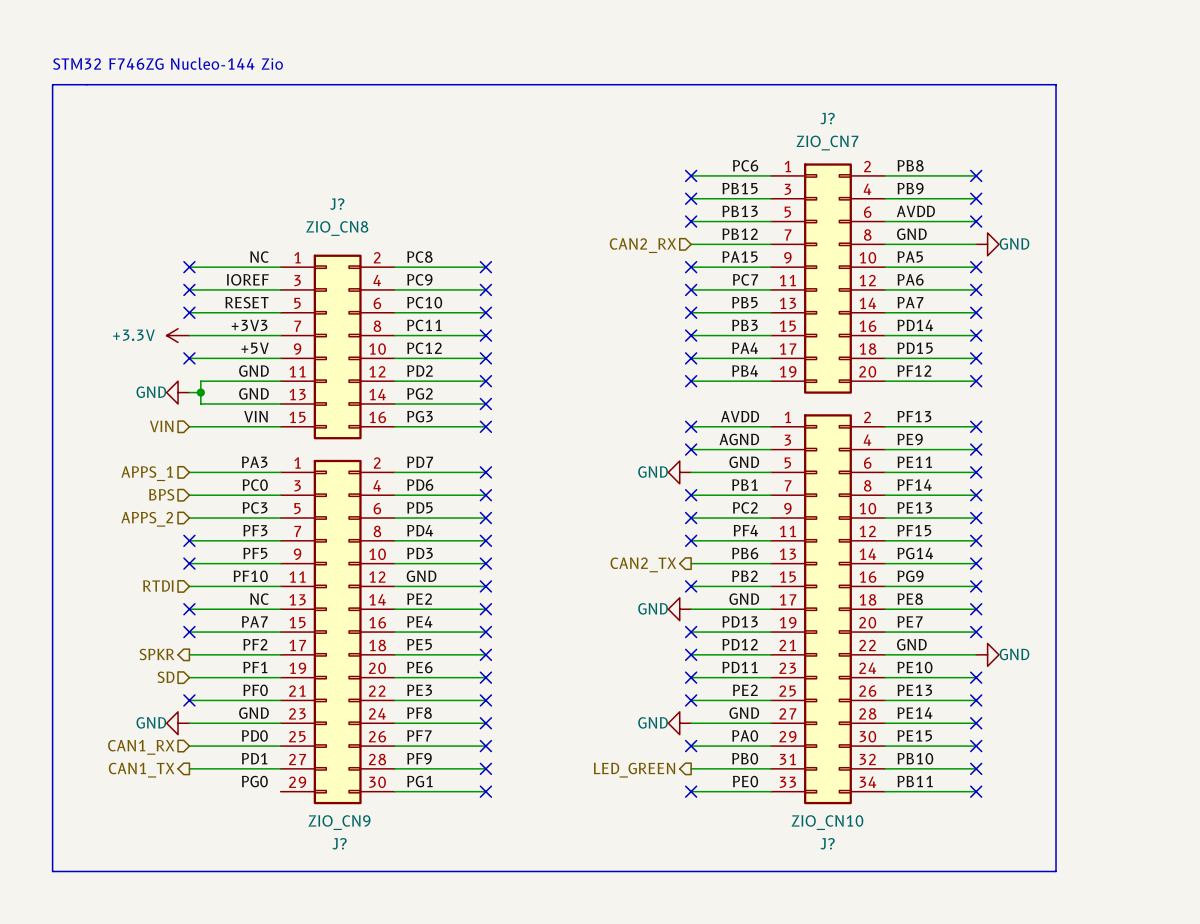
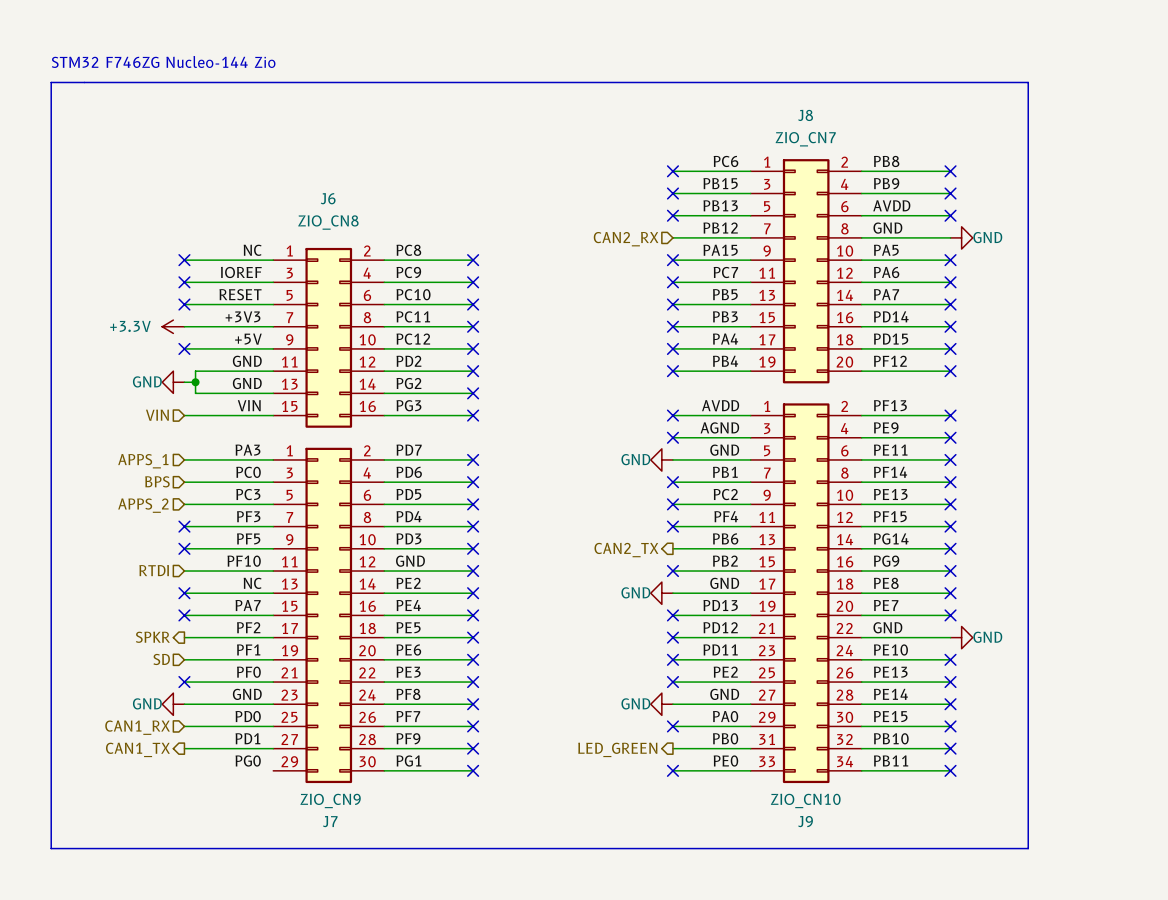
J? name: J? (827, 118) -> J8 (805, 115)
J? name: J? (337, 204) -> J6 (328, 198)
J? name: J? (339, 843) -> J7 (330, 821)
J? name: J? (827, 843) -> J9 (805, 821)

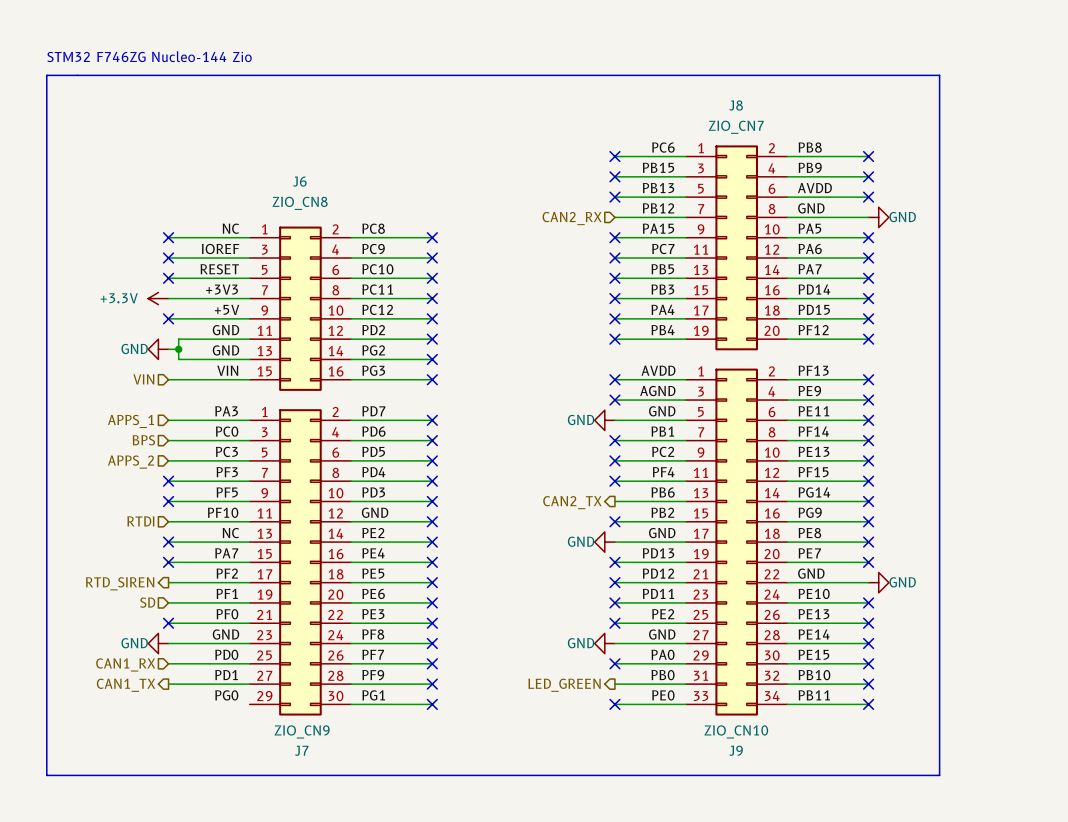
hierarchical label: SPKR (152, 637) -> RTD_SIREN (120, 583)

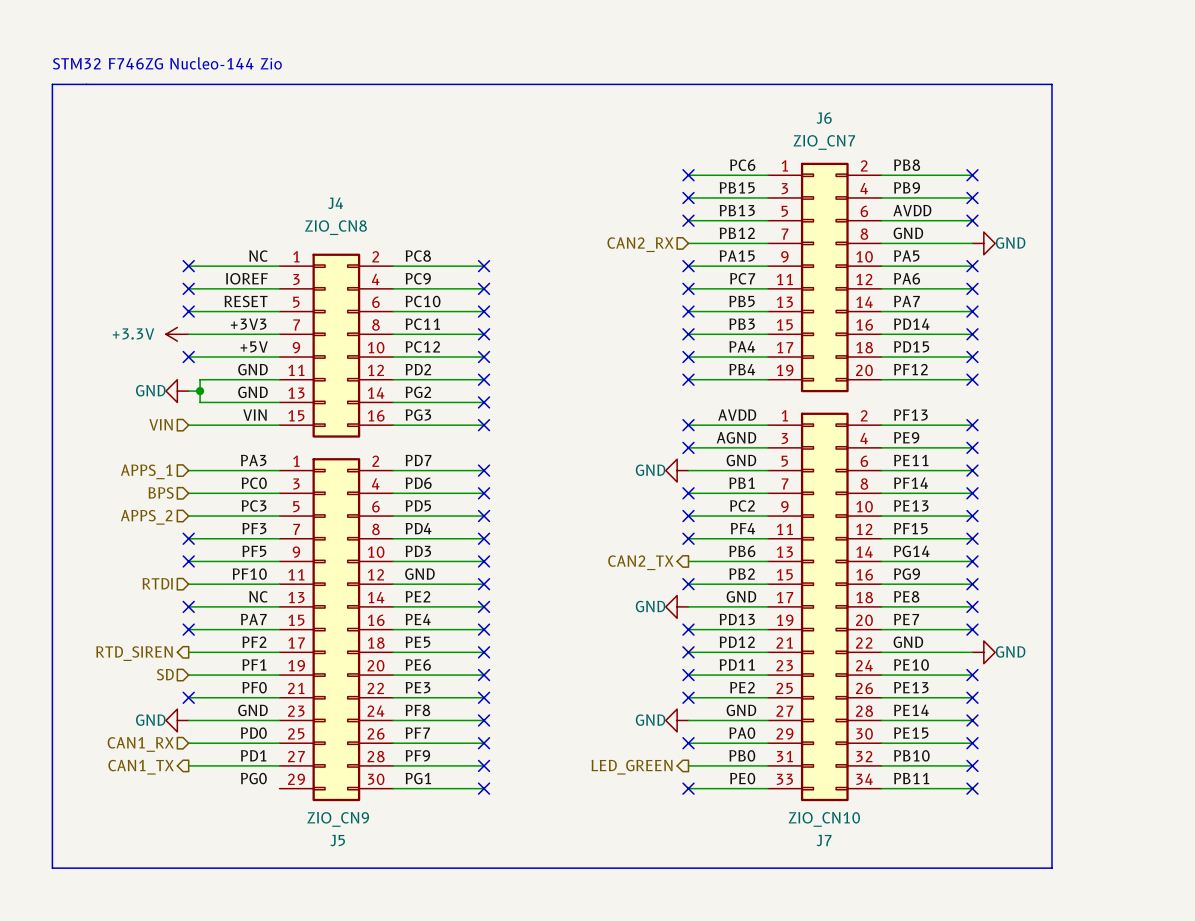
J8 name: J8 (736, 105) -> J6 (824, 118)
J6 name: J6 (299, 181) -> J4 (335, 203)
J7 name: J7 (301, 750) -> J5 (337, 840)
J9 name: J9 (736, 750) -> J7 (824, 840)

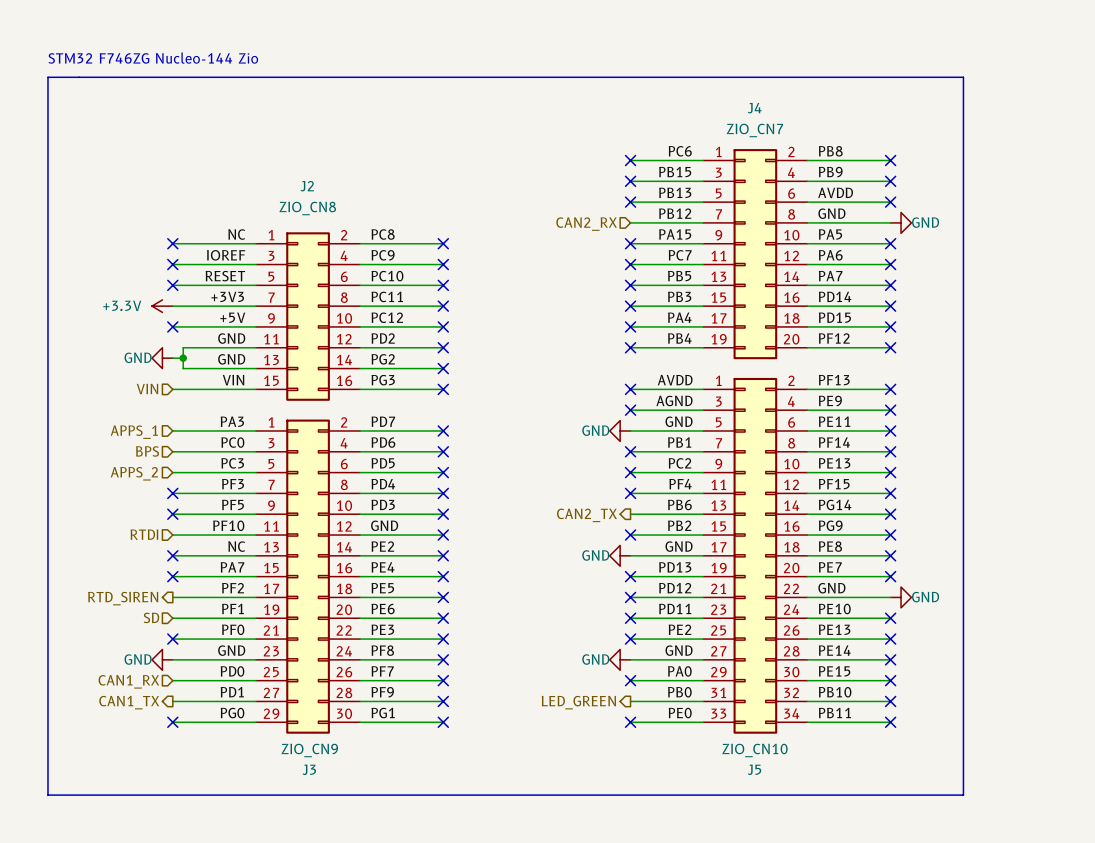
J6 name: J6 (824, 118) -> J4 (754, 108)
J4 name: J4 (335, 203) -> J2 (307, 186)
wire: none -> (172, 722) (256, 722)
no-connect mark: none -> (172, 722)
J5 name: J5 (337, 840) -> J3 (309, 769)
J7 name: J7 (824, 840) -> J5 (754, 769)

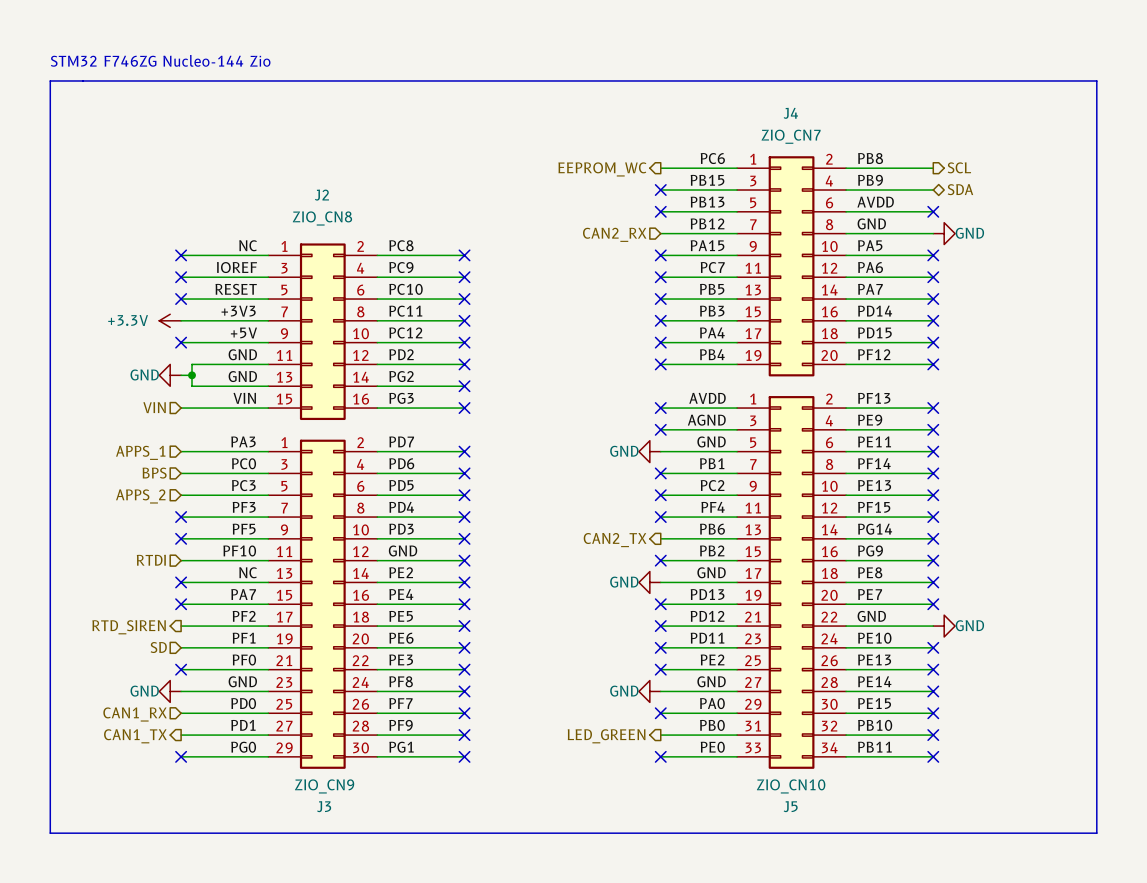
line: (963, 77) (963, 795) -> (1009, 80) (1096, 80) (1096, 833) (1009, 833)
no-connect mark: (630, 160) -> none
no-connect mark: (890, 160) -> none
hierarchical label: none -> SCL (959, 167)
hierarchical label: none -> EEPROM_WC (602, 169)
hierarchical label: none -> SDA (960, 189)
no-connect mark: (890, 181) -> none

